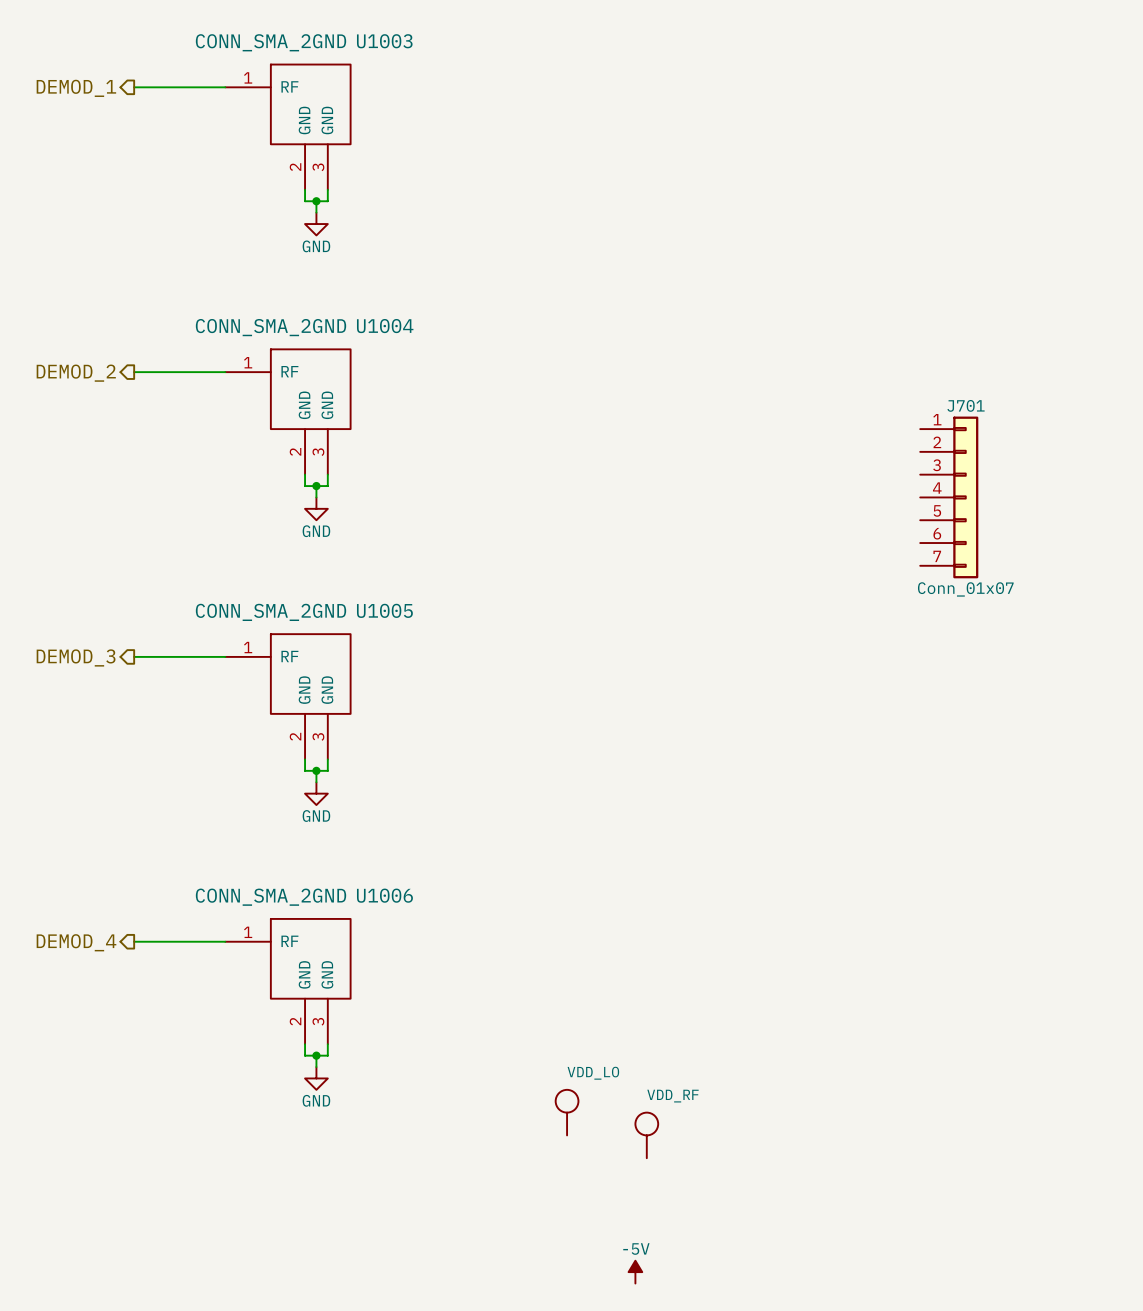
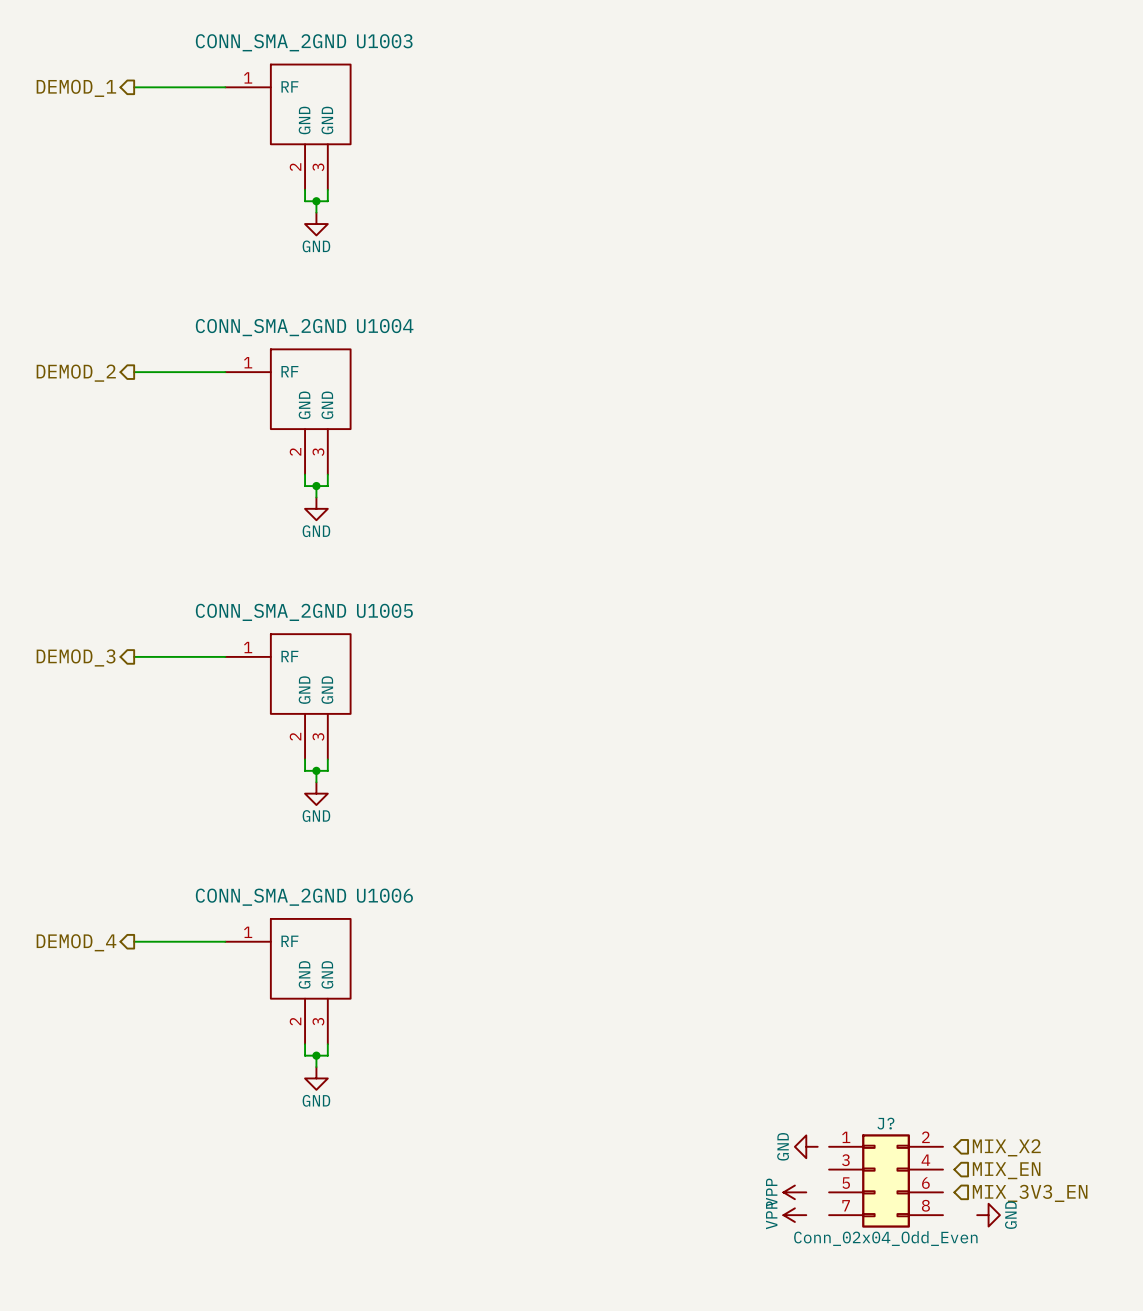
J701: Conn_01x07 (949, 497) -> none
power symbol: VDD_LO (567, 1112) -> none
power symbol: VDD_RF (646, 1135) -> none
power symbol: none -> GND (806, 1146)
hierarchical label: none -> MIX_X2 (1006, 1147)
hierarchical label: none -> MIX_EN (1006, 1170)
J?: none -> Conn_02x04_Odd_Even (886, 1180)
power symbol: none -> VPP (794, 1192)
hierarchical label: none -> MIX_3V3_EN (1030, 1193)
power symbol: none -> VPP (794, 1215)
power symbol: none -> GND (988, 1215)
power symbol: -5V (635, 1272) -> none

